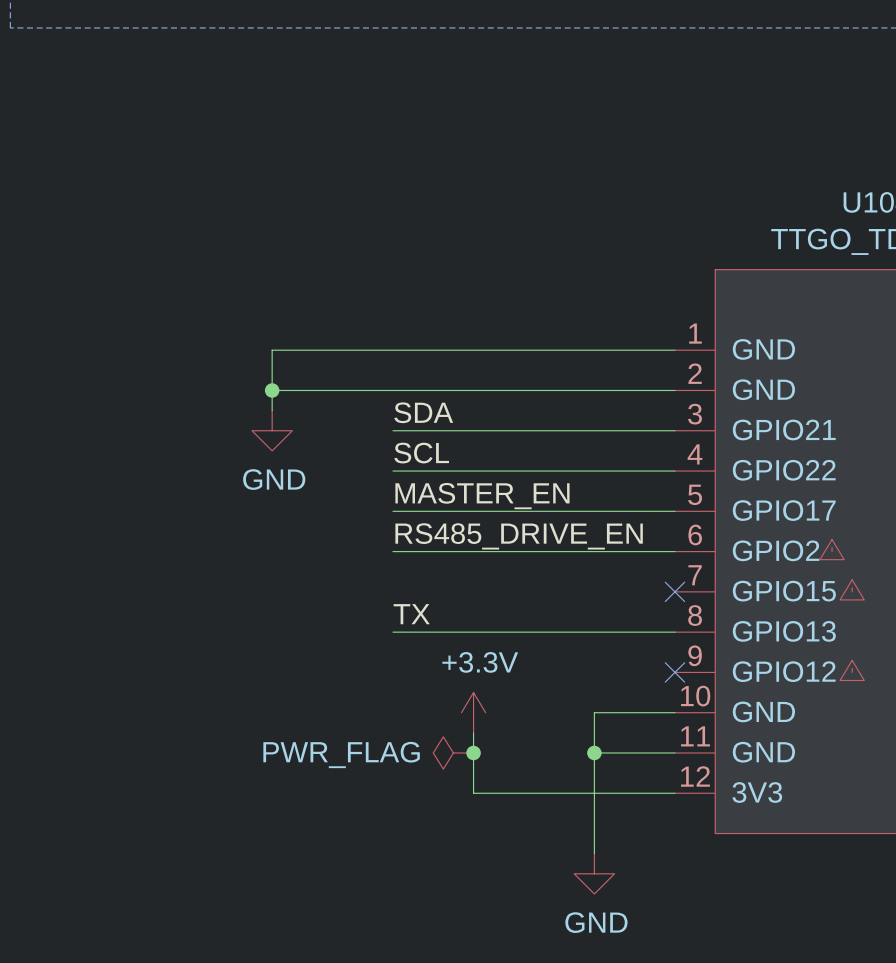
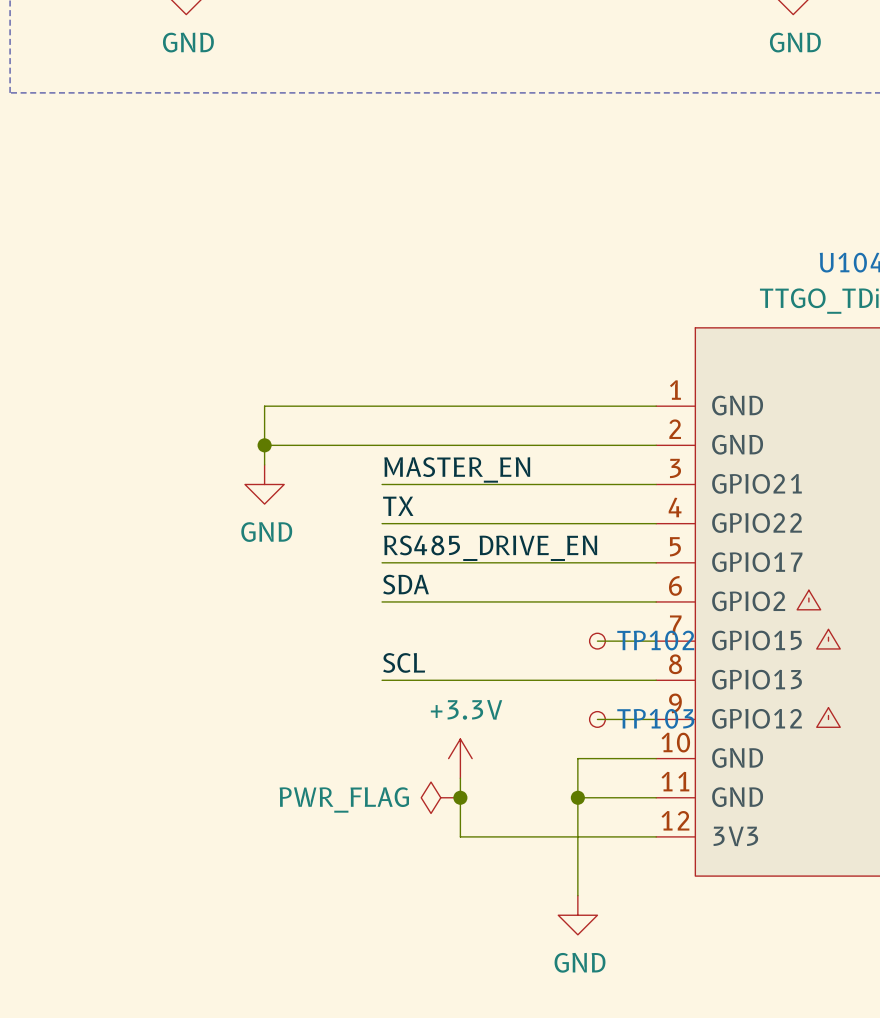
label: SDA (423, 412) -> MASTER_EN (457, 469)
label: SCL (421, 453) -> TX (398, 506)
label: MASTER_EN (482, 496) -> RS485_DRIVE_EN (490, 548)
label: RS485_DRIVE_EN (519, 536) -> SDA (406, 584)
wire: none -> (597, 641) (656, 641)
TP102: none -> (597, 641)
no-connect mark: (674, 591) -> none
label: TX (411, 614) -> SCL (404, 662)
wire: none -> (597, 719) (656, 719)
TP103: none -> (597, 719)
no-connect mark: (674, 672) -> none

